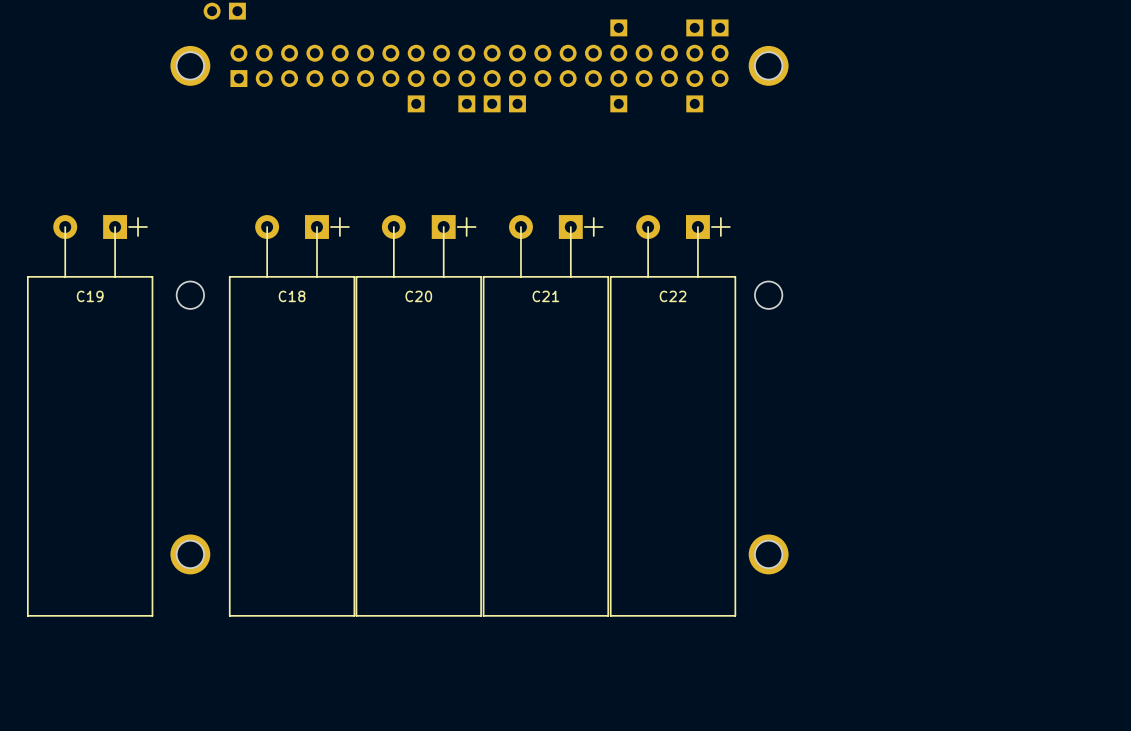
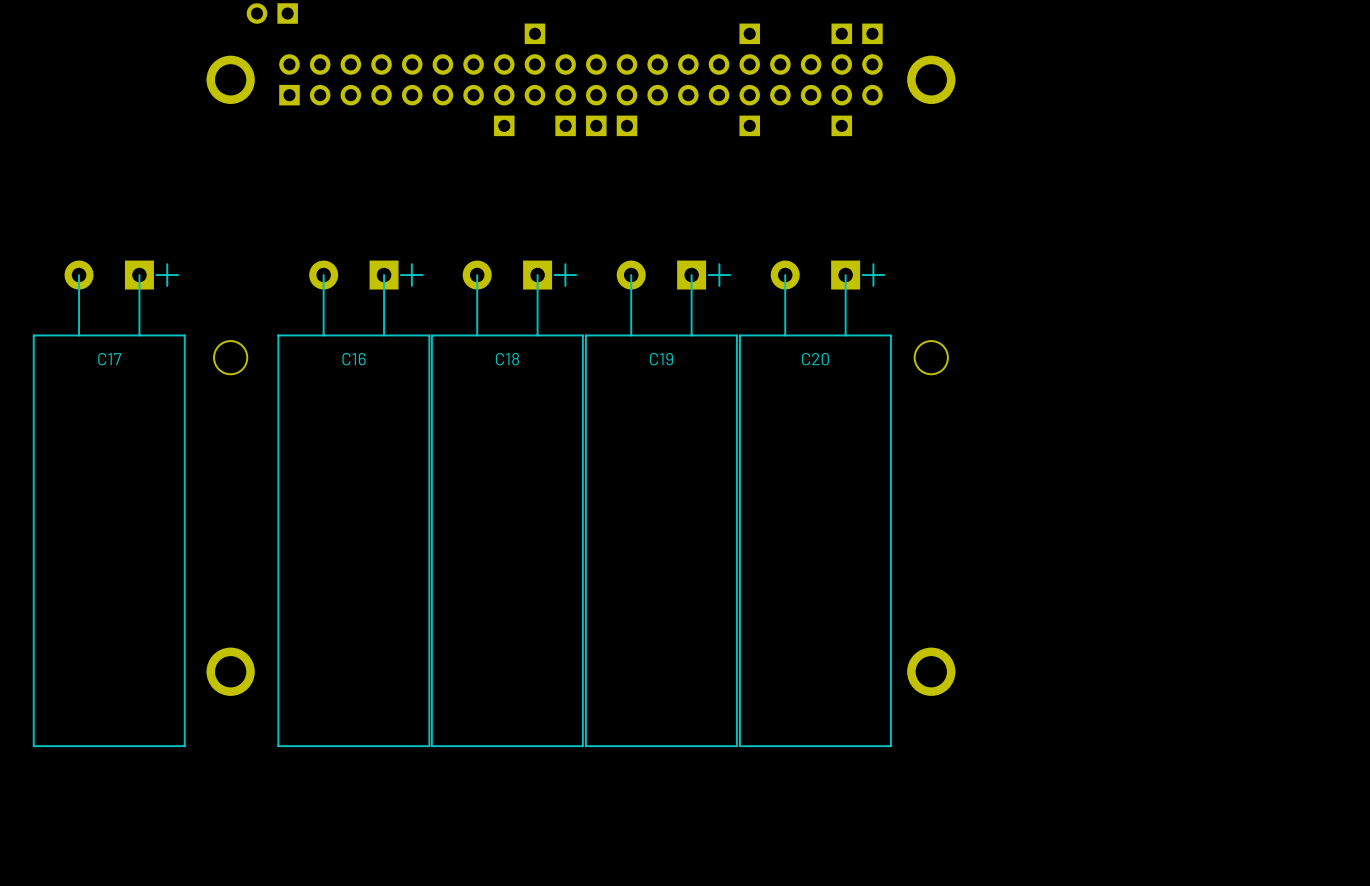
part: none -> (534, 33)
C19 name: C19 (90, 296) -> C17 (109, 359)
C18 name: C18 (292, 296) -> C16 (354, 359)
C20 name: C20 (418, 296) -> C18 (507, 359)
C21 name: C21 (545, 296) -> C19 (661, 359)
C22 name: C22 (673, 296) -> C20 (815, 359)

